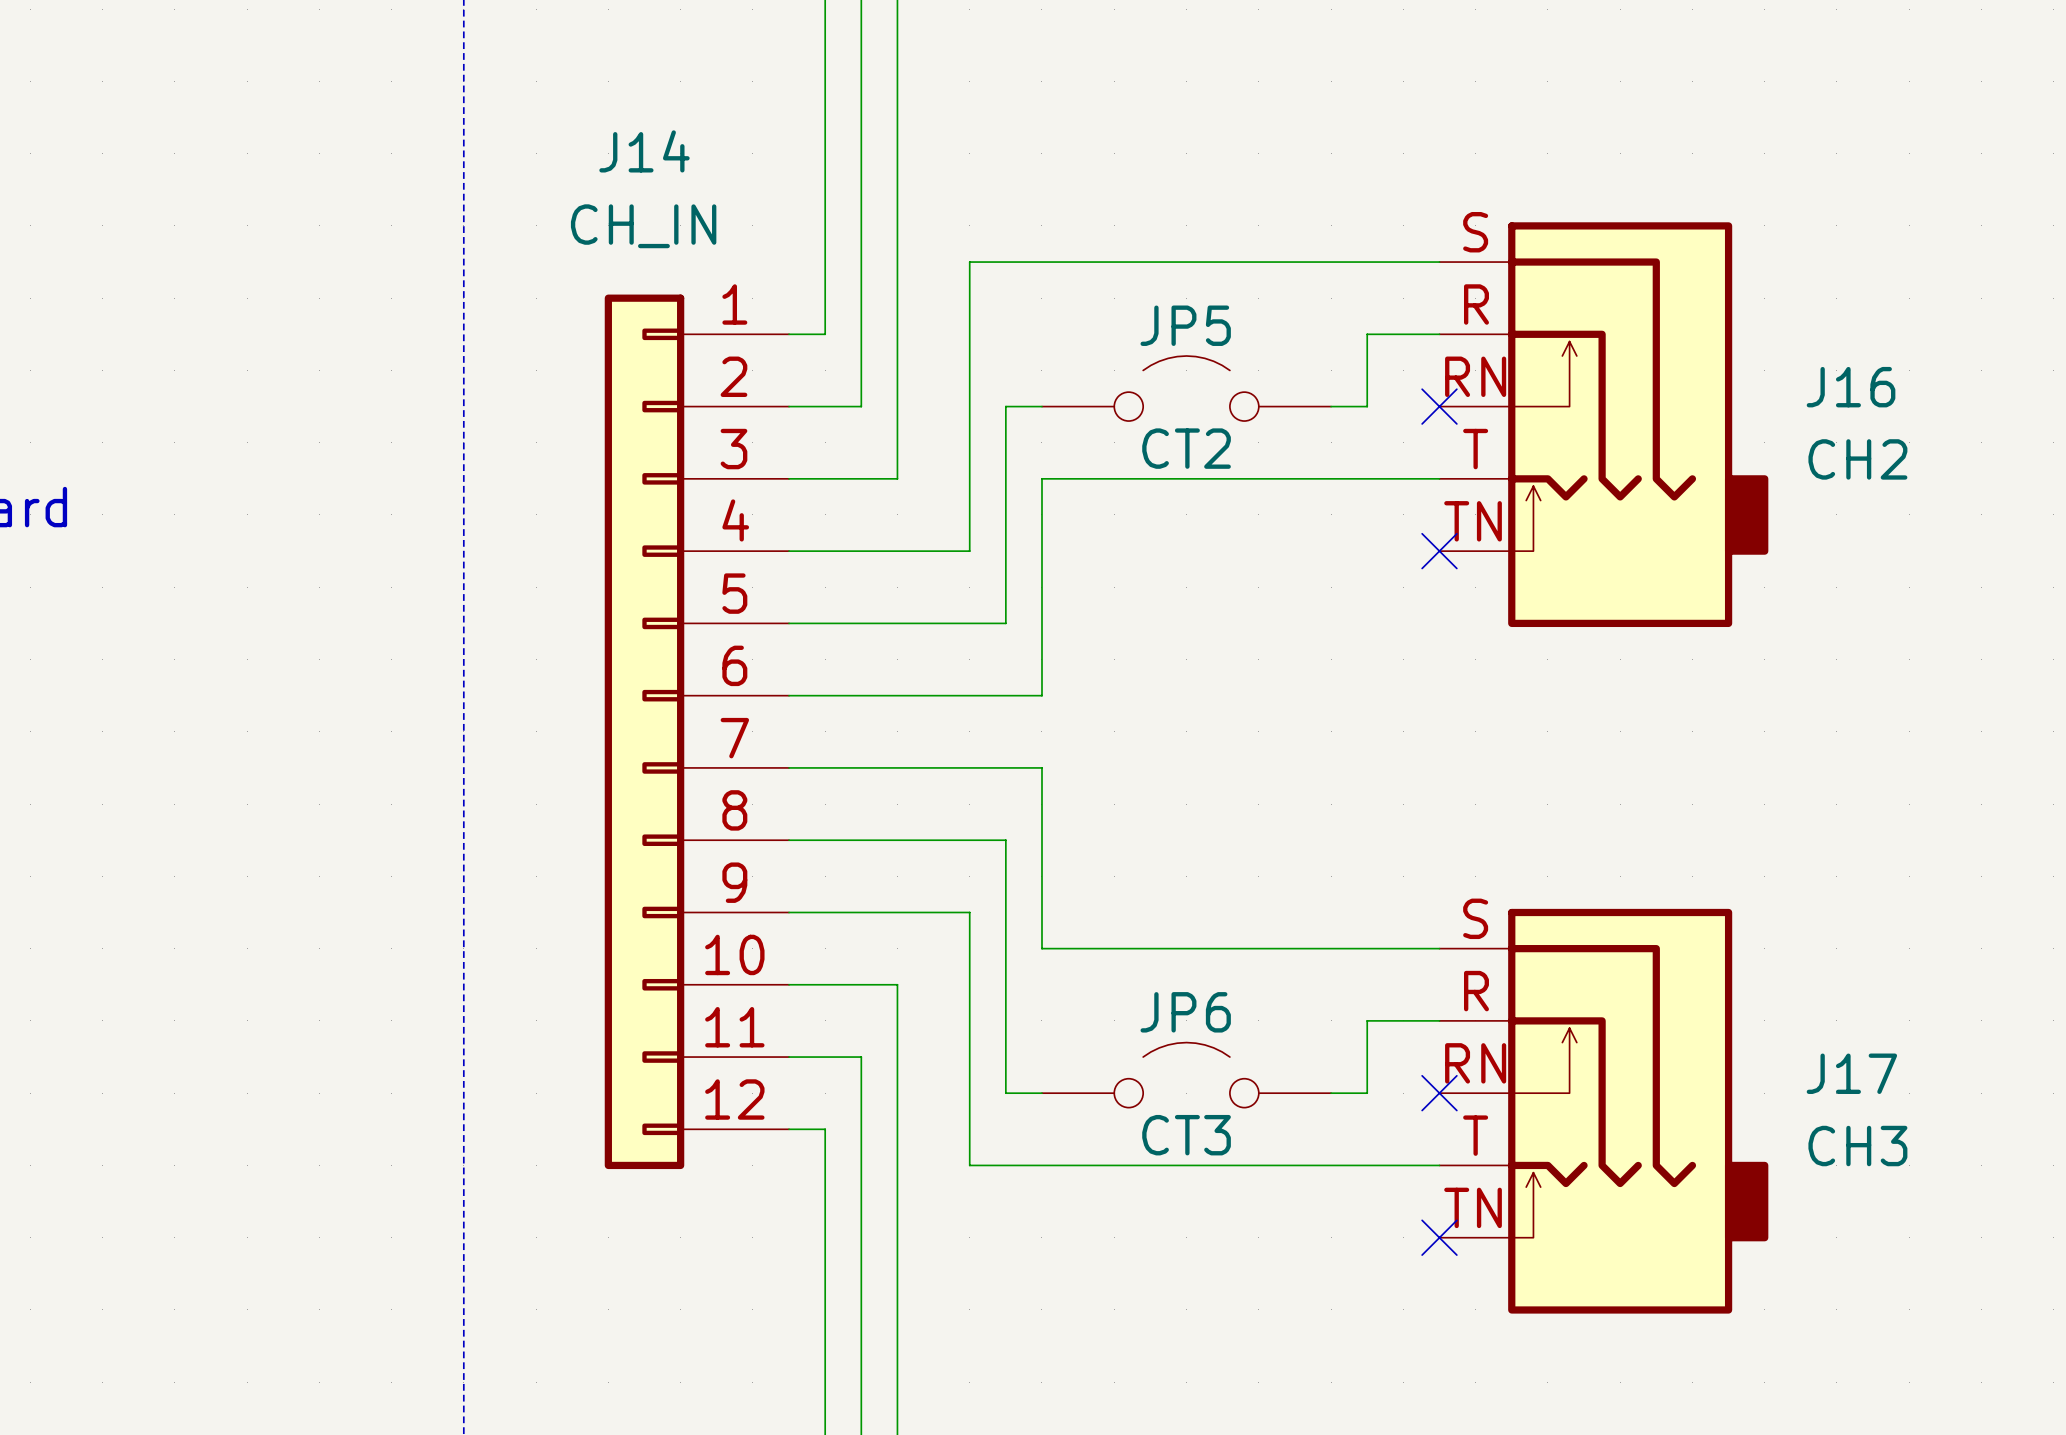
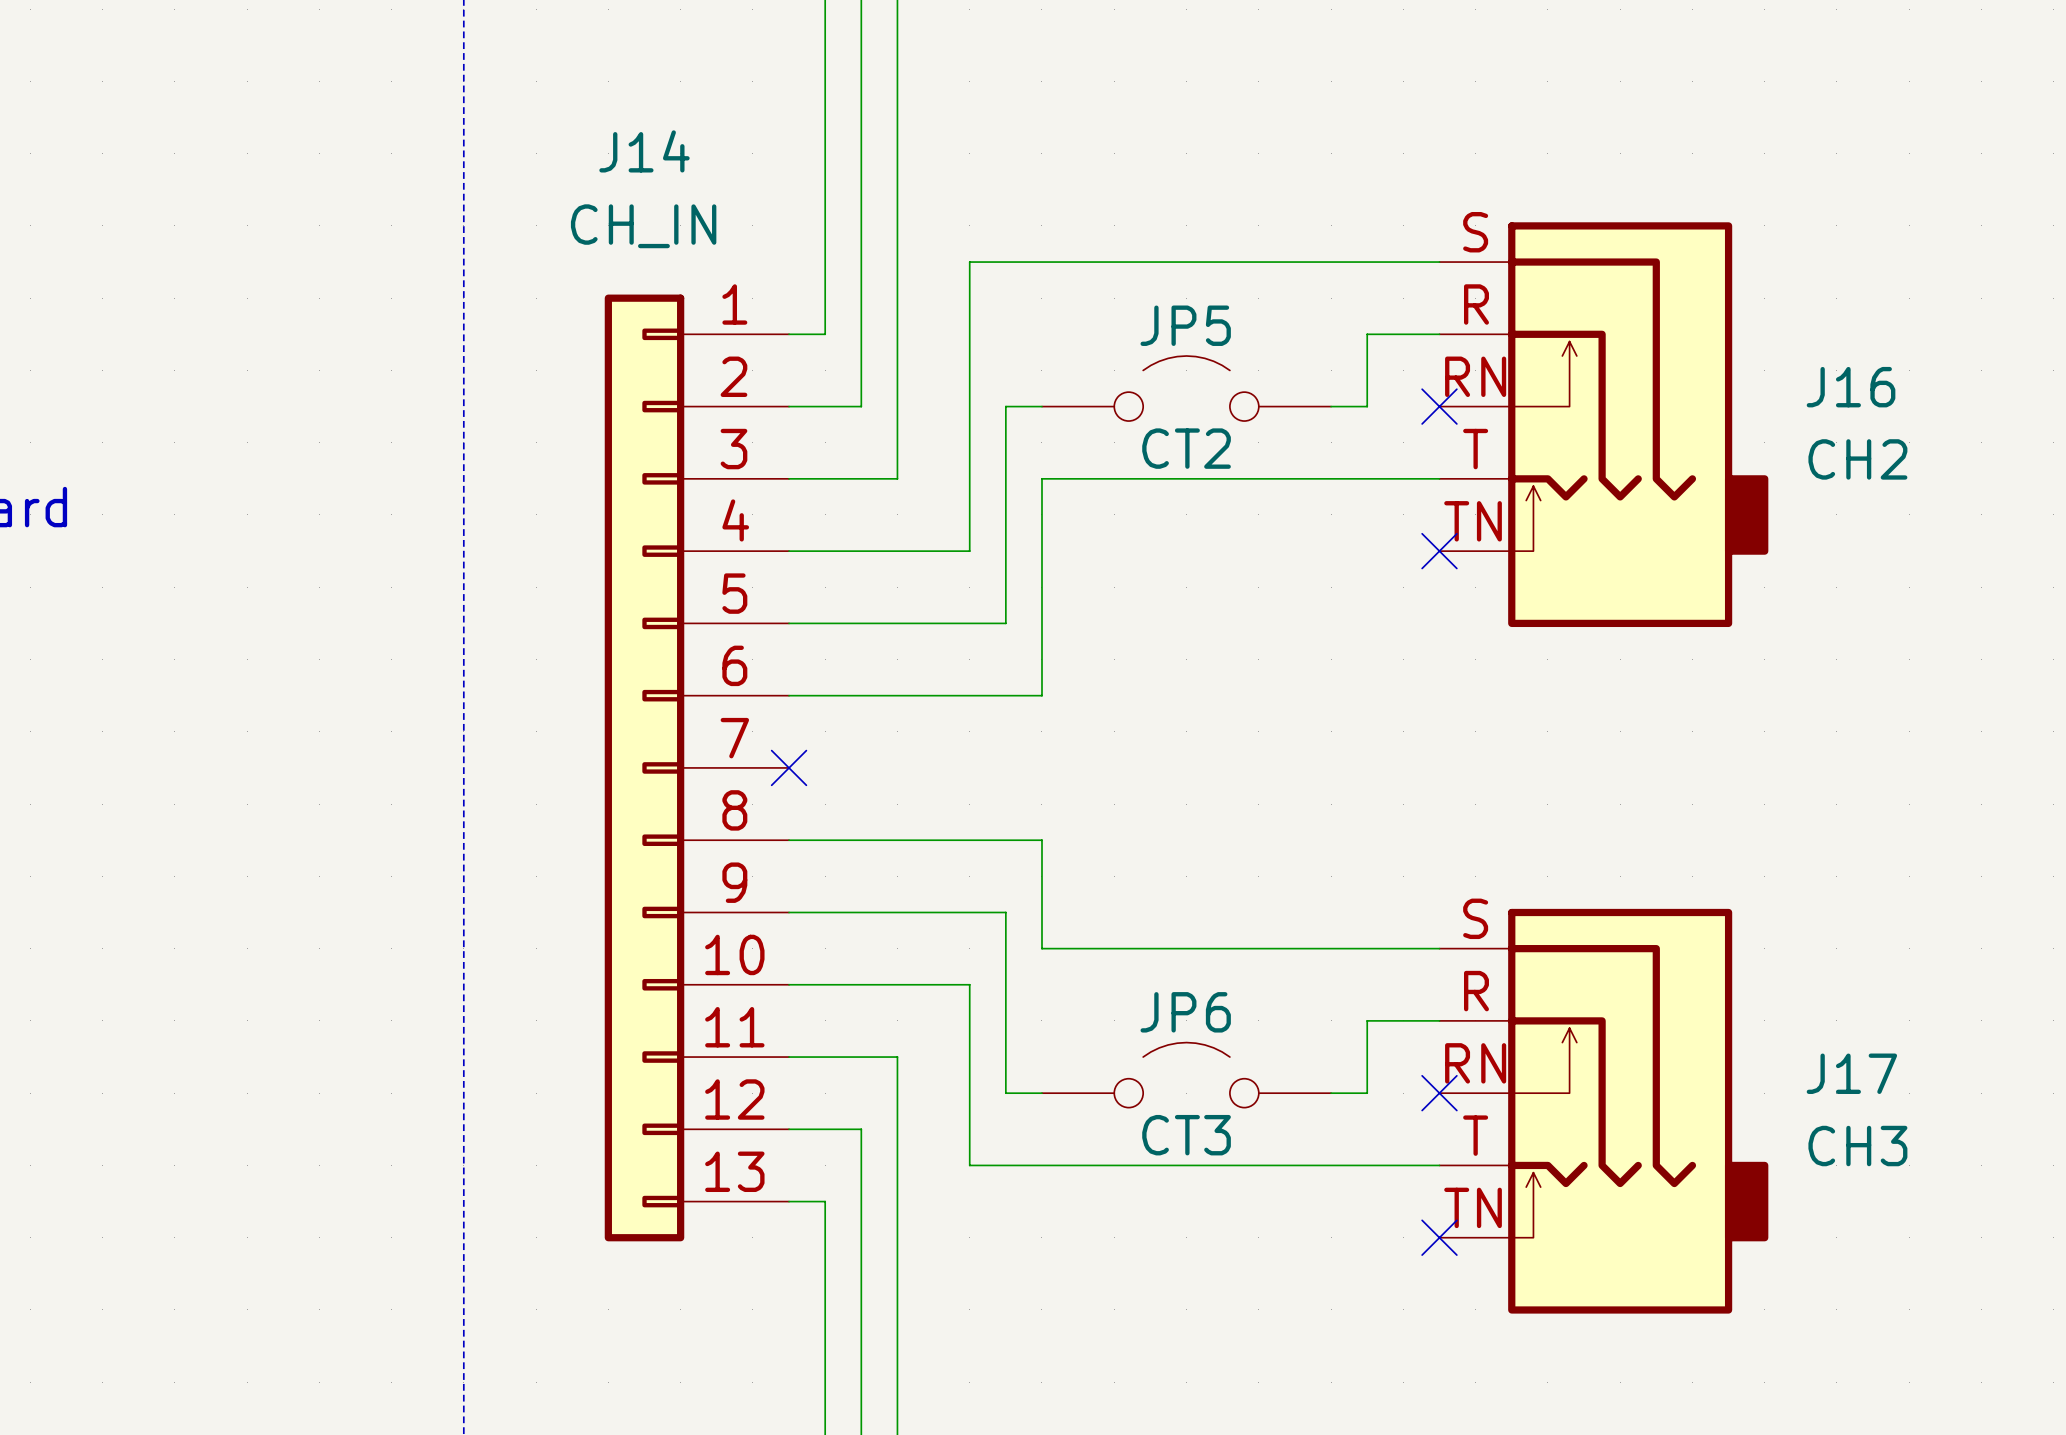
J14 symbol: [604, 294, 790, 1170] -> [604, 294, 790, 1242]
wire: (789, 767) (1041, 767) (1041, 840) -> none
no-connect mark: none -> (789, 767)
wire: (1005, 840) (1005, 912) -> (1005, 840) (1041, 840)
wire: (969, 912) (969, 984) -> (969, 912) (1005, 912)
wire: (897, 984) (897, 1057) -> (897, 984) (969, 984)
wire: (861, 1057) (861, 1129) -> (861, 1057) (897, 1057)
wire: (825, 1129) (825, 1201) -> (789, 1201) (825, 1201)
wire: none -> (825, 1129) (861, 1129)

